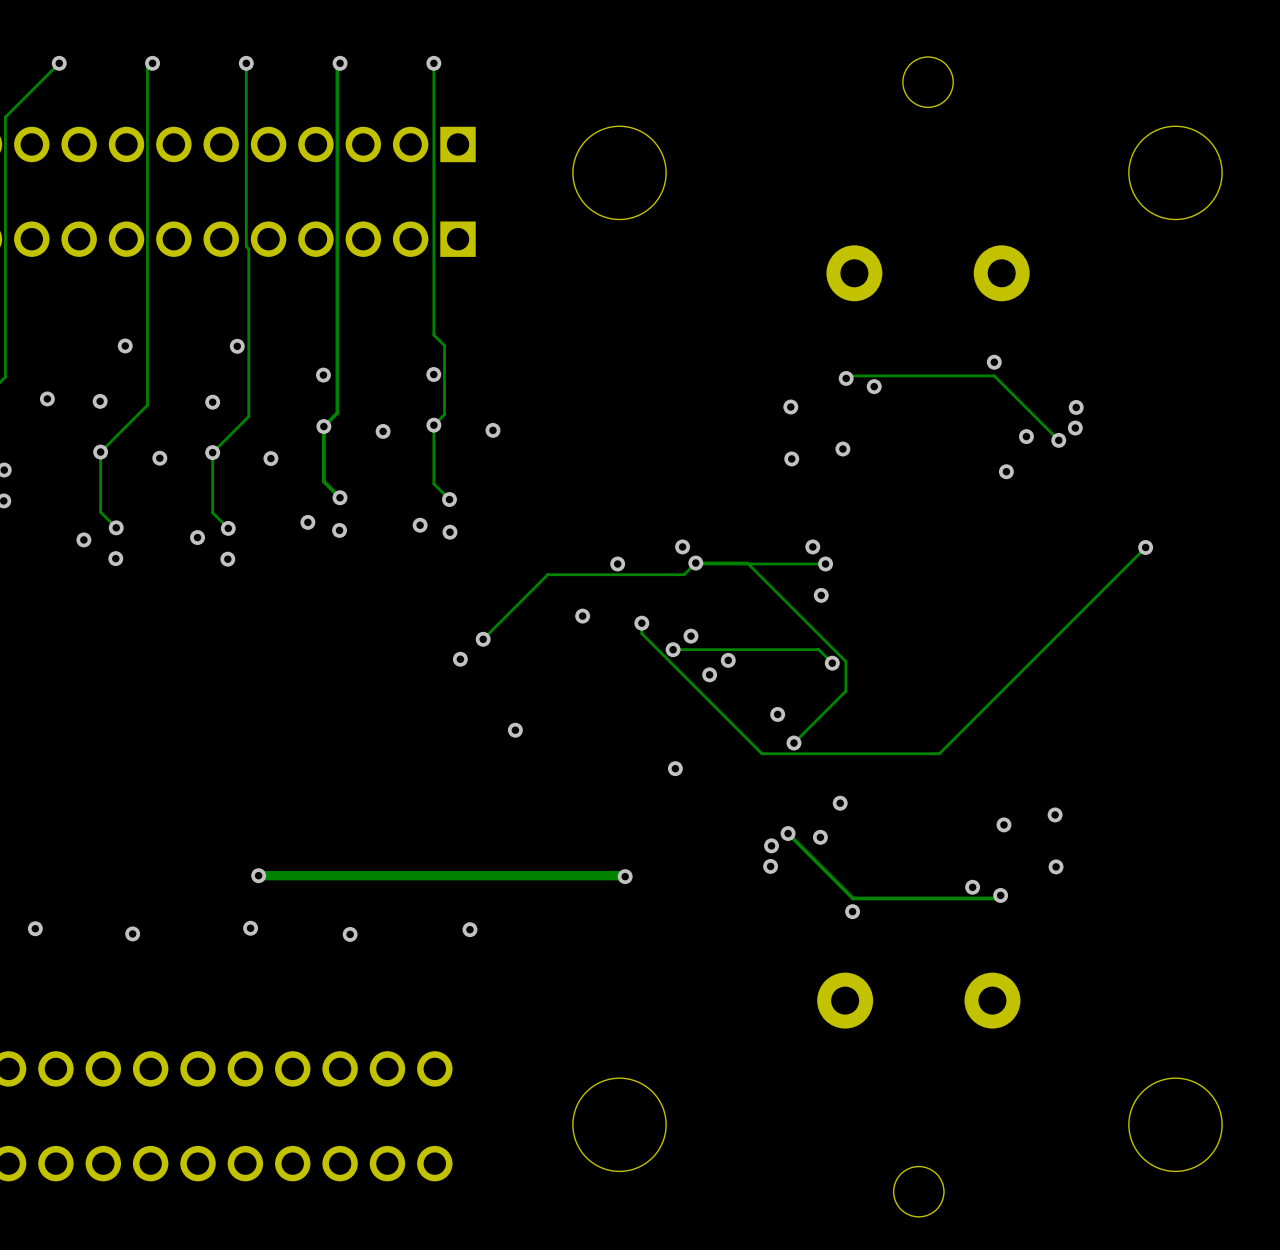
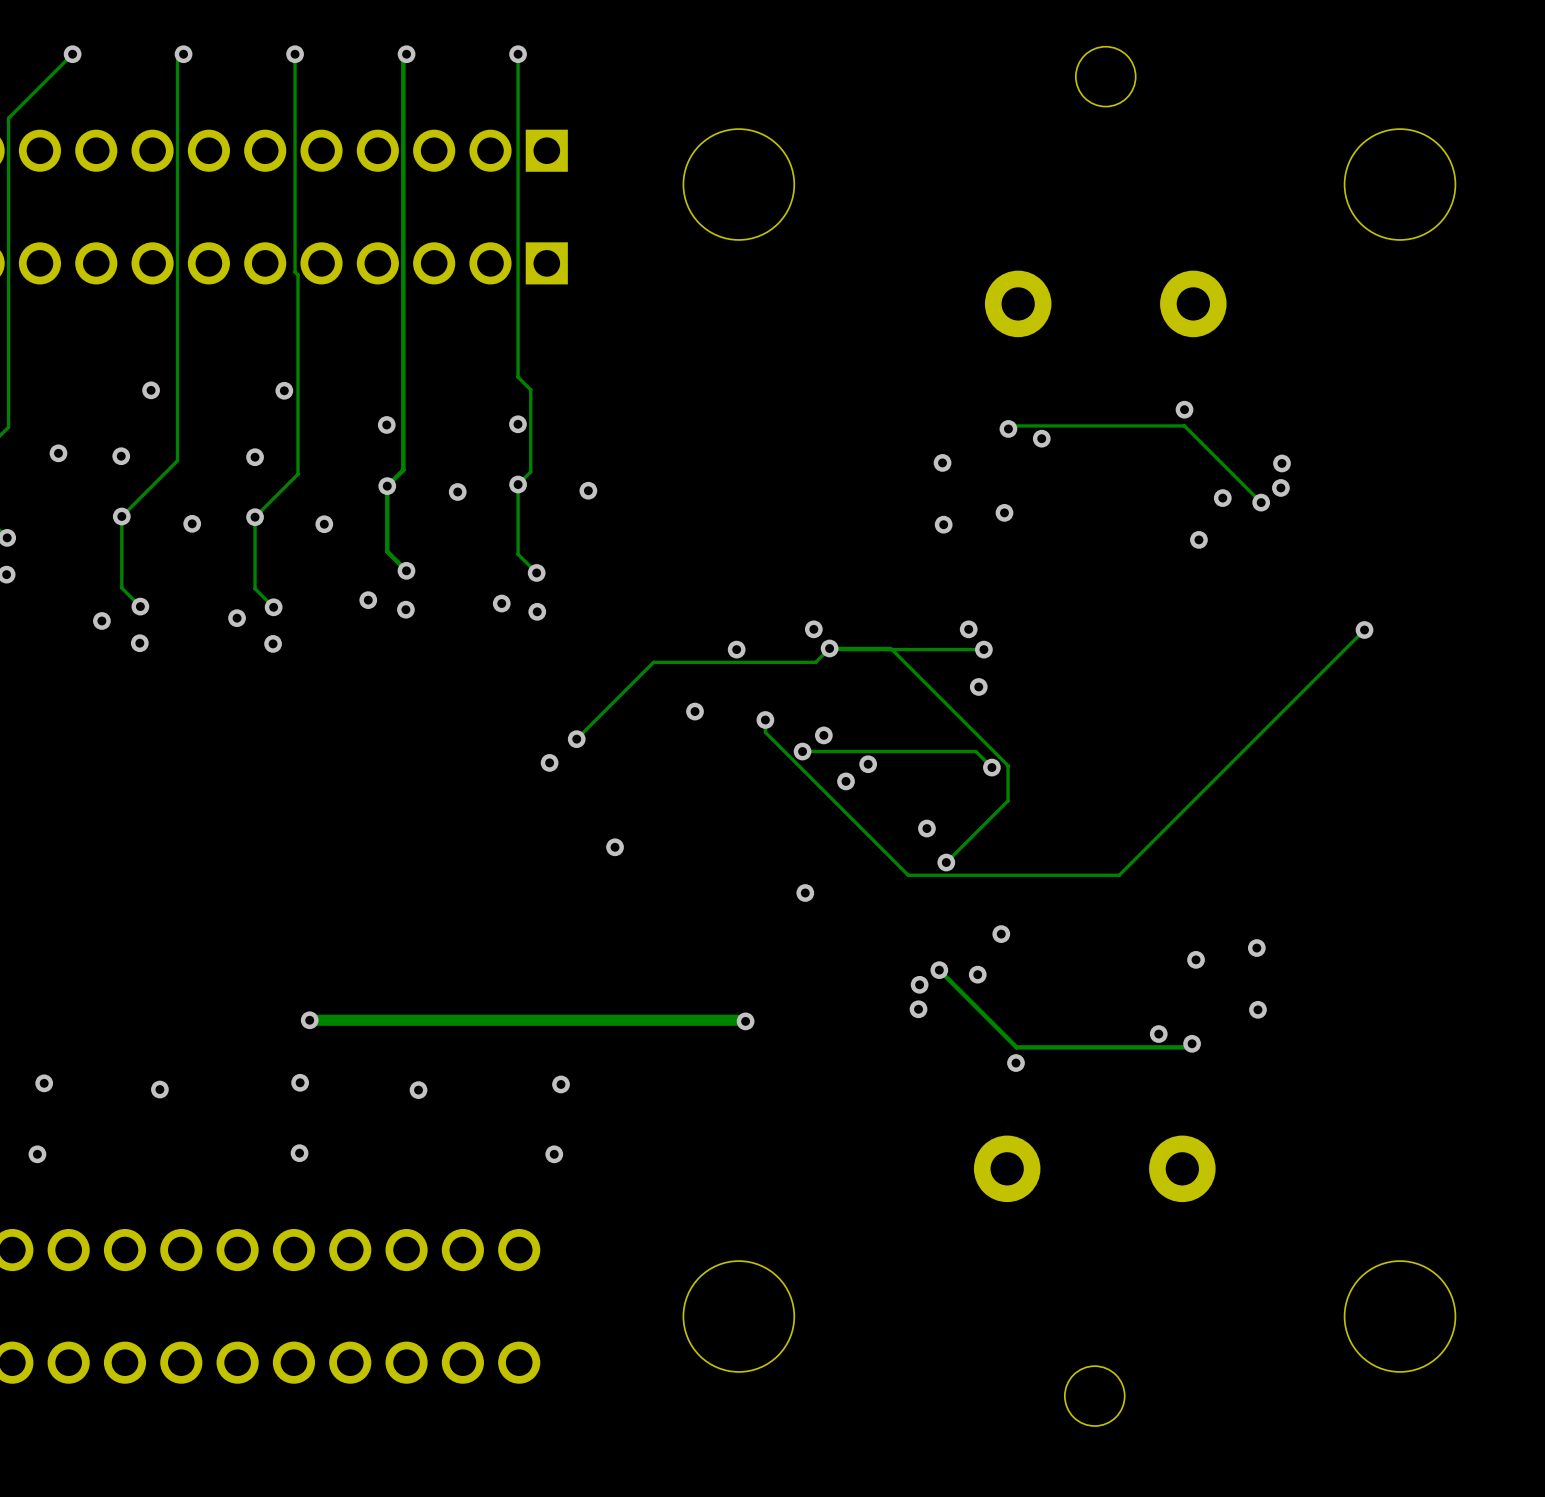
via: none -> (299, 1153)
via: none -> (37, 1154)
via: none -> (554, 1154)

